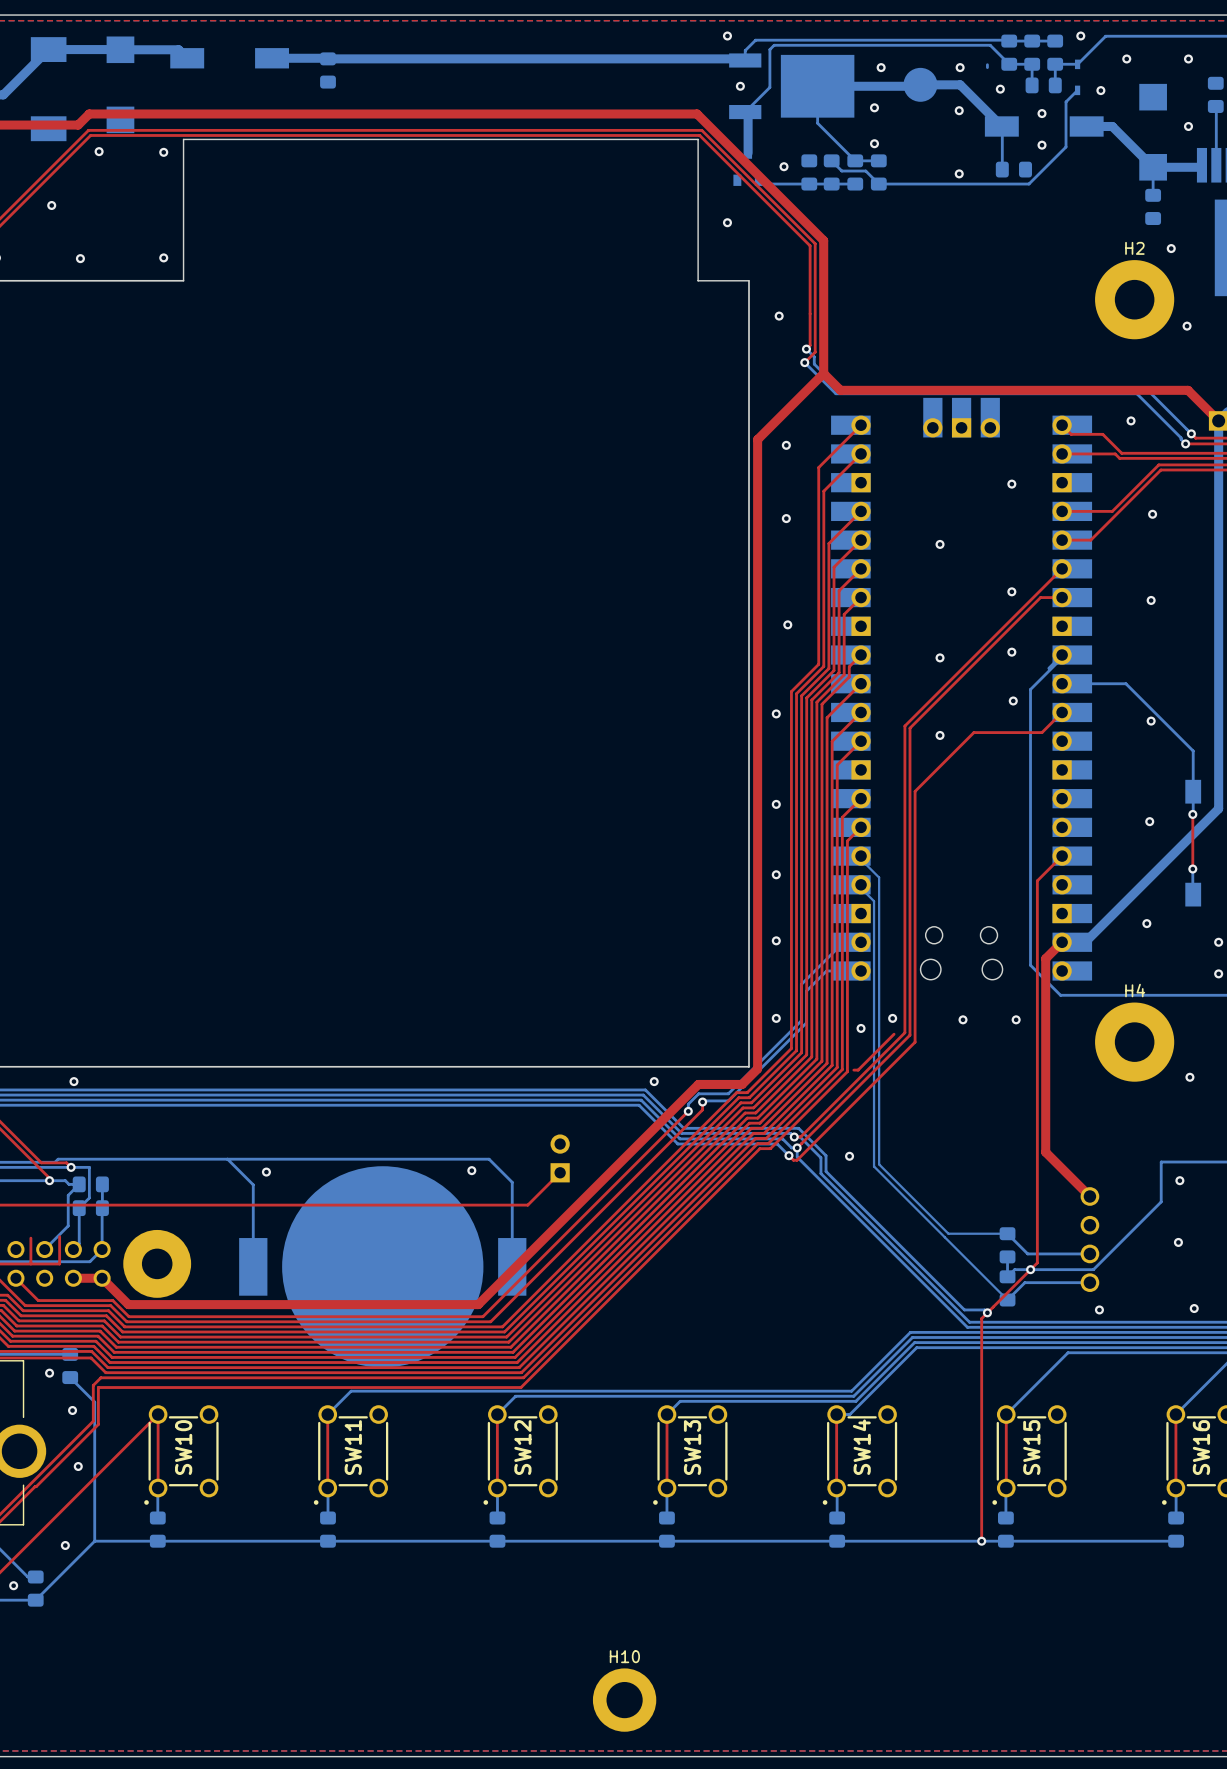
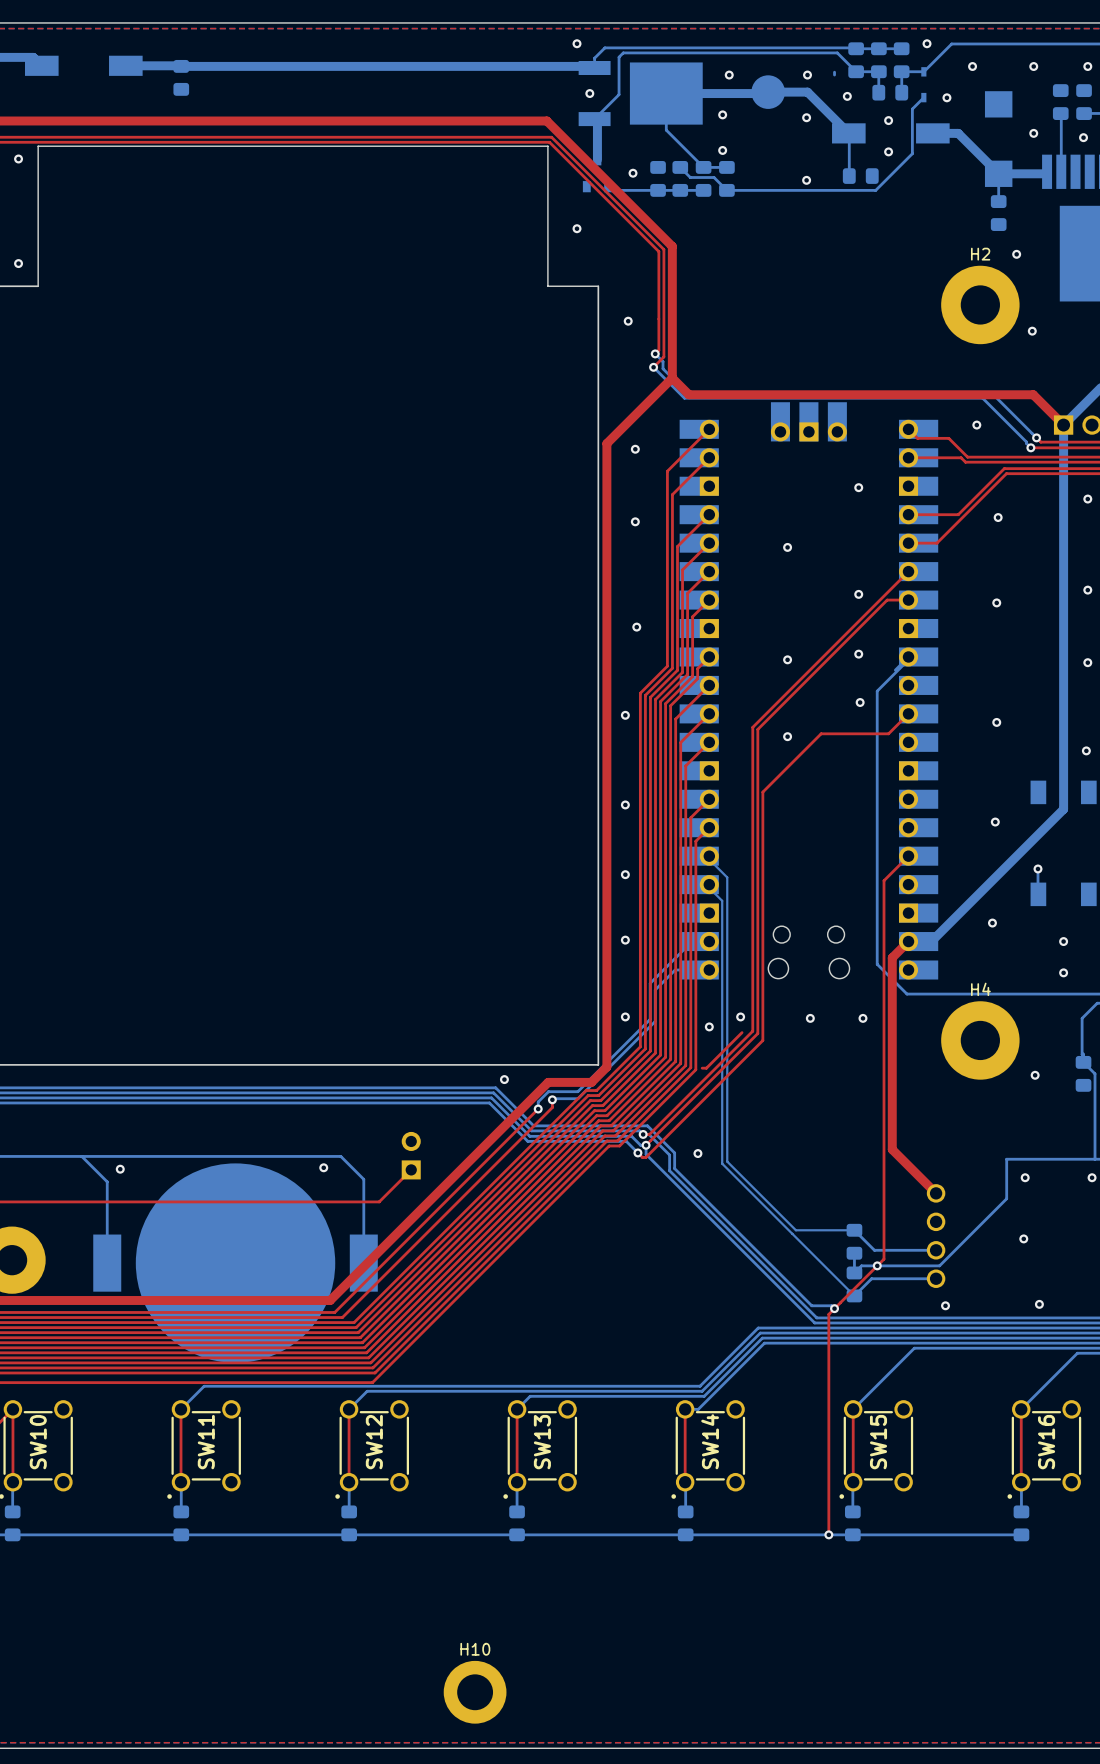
bottom track: (1062, 683) (1125, 683) (1193, 751) (1192, 814) -> none
top track: (1192, 814) (1192, 869) -> none
via: (1192, 814) -> none

